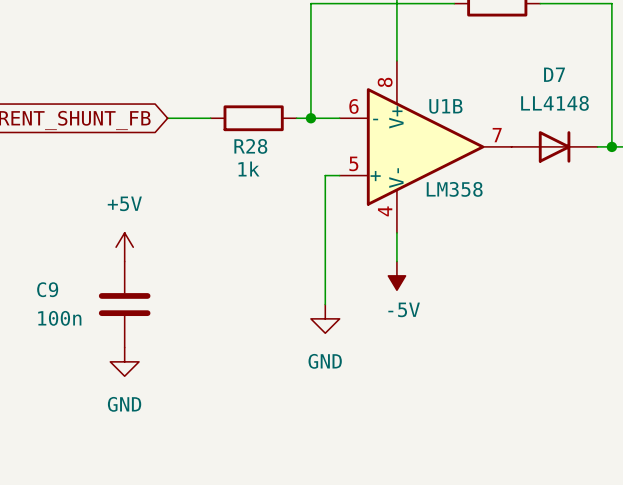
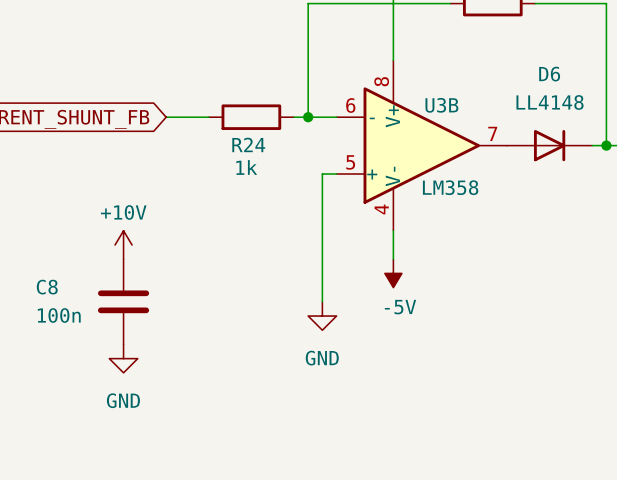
D7 name: D7 (554, 74) -> D6 (549, 74)
U1B name: U1B (445, 106) -> U3B (441, 105)
R28 name: R28 (250, 146) -> R24 (248, 144)
power symbol: +5V (124, 247) -> +10V (123, 245)
C9 name: C9 (47, 289) -> C8 (47, 287)

